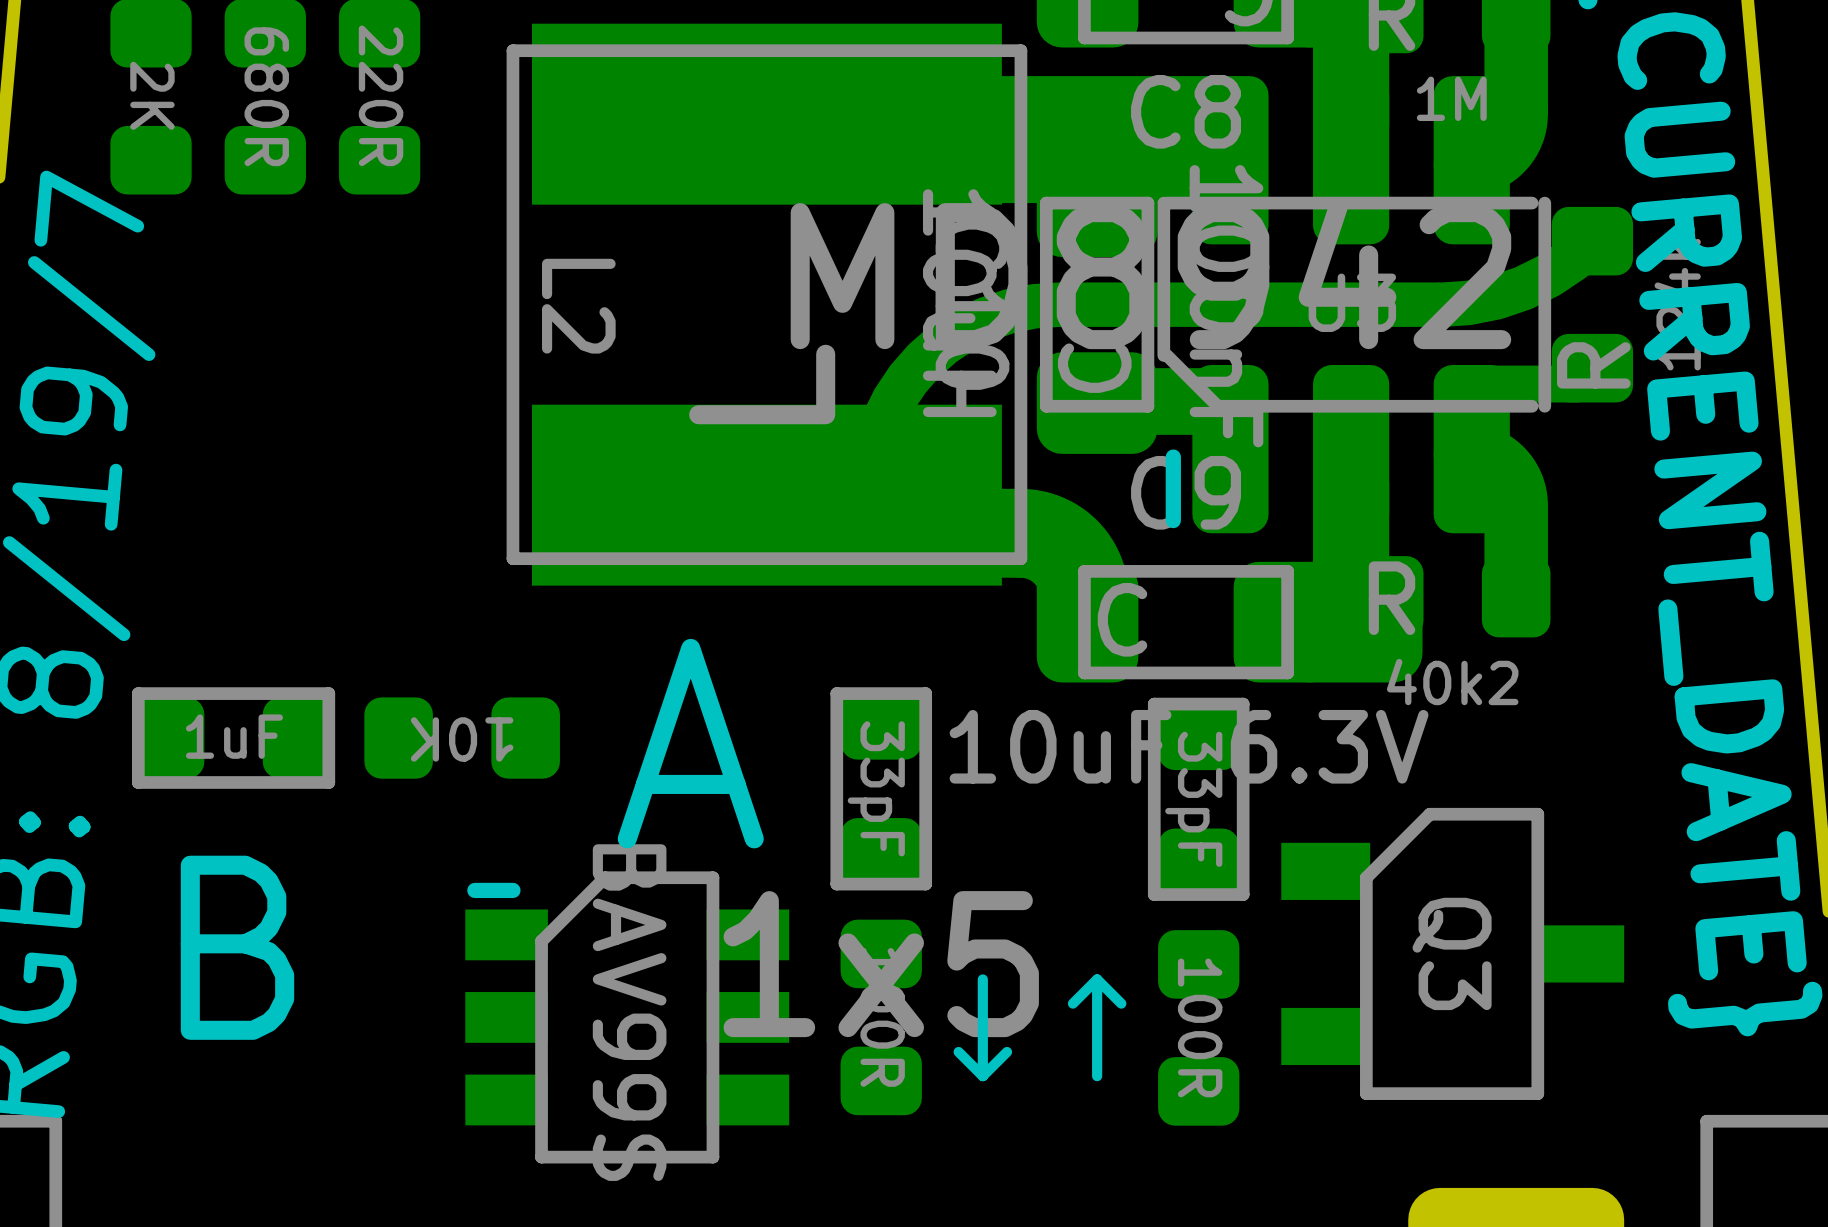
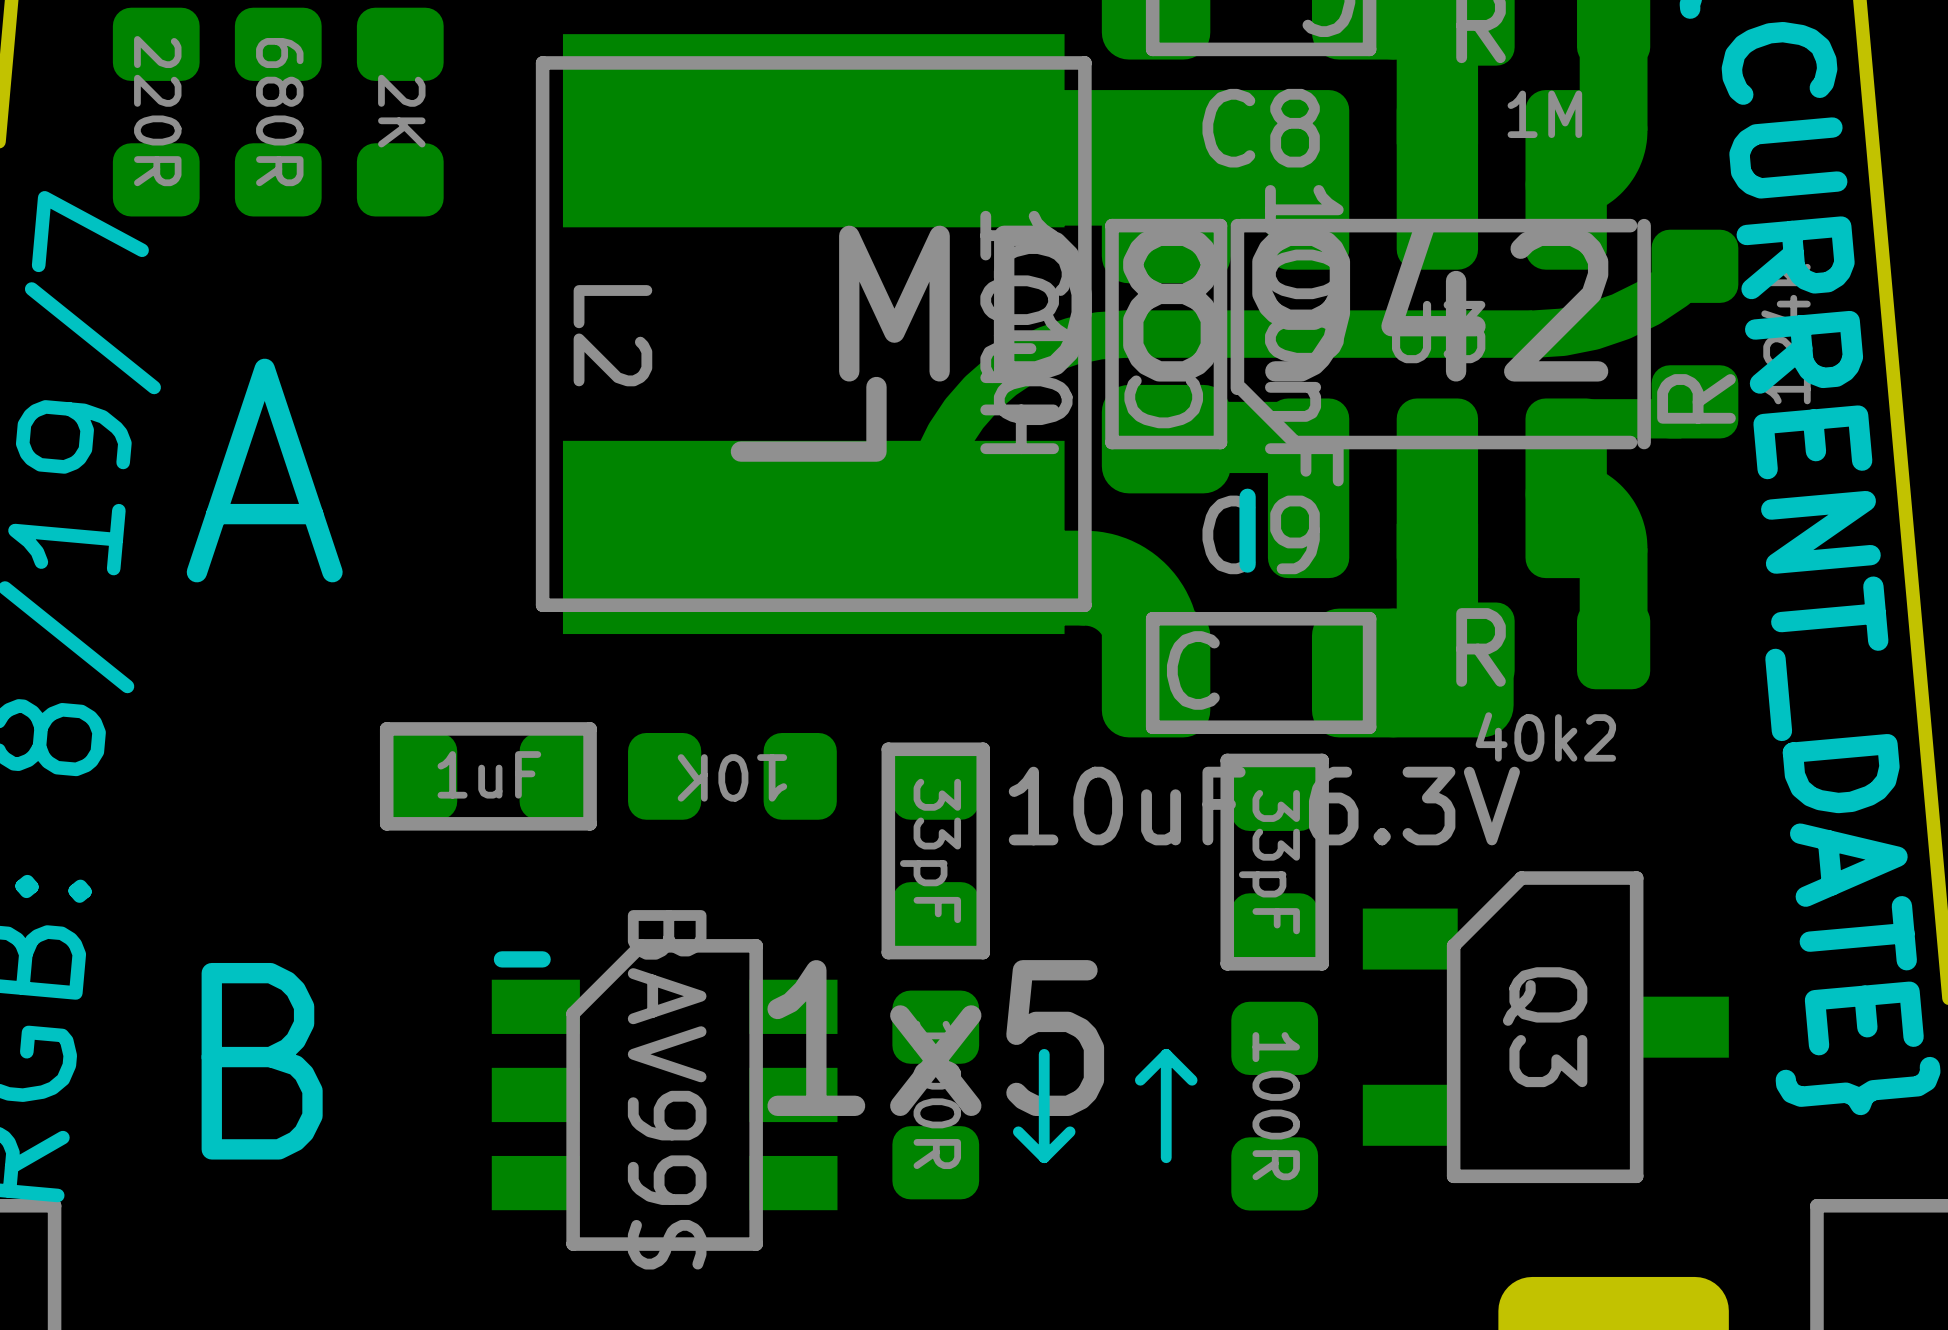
part value: 2K (152, 95) -> 220R (157, 111)
part value: 220R (381, 95) -> 2K (401, 111)
part footprint: [364, 697, 560, 779] -> [379, 722, 597, 831]
part: none -> 10K (732, 776)
part: 1uF (233, 738) -> none
part value: 10K (462, 739) -> 1uF (489, 774)
text position: A (690, 743) -> A (264, 470)
text position: B (237, 947) -> B (262, 1061)

